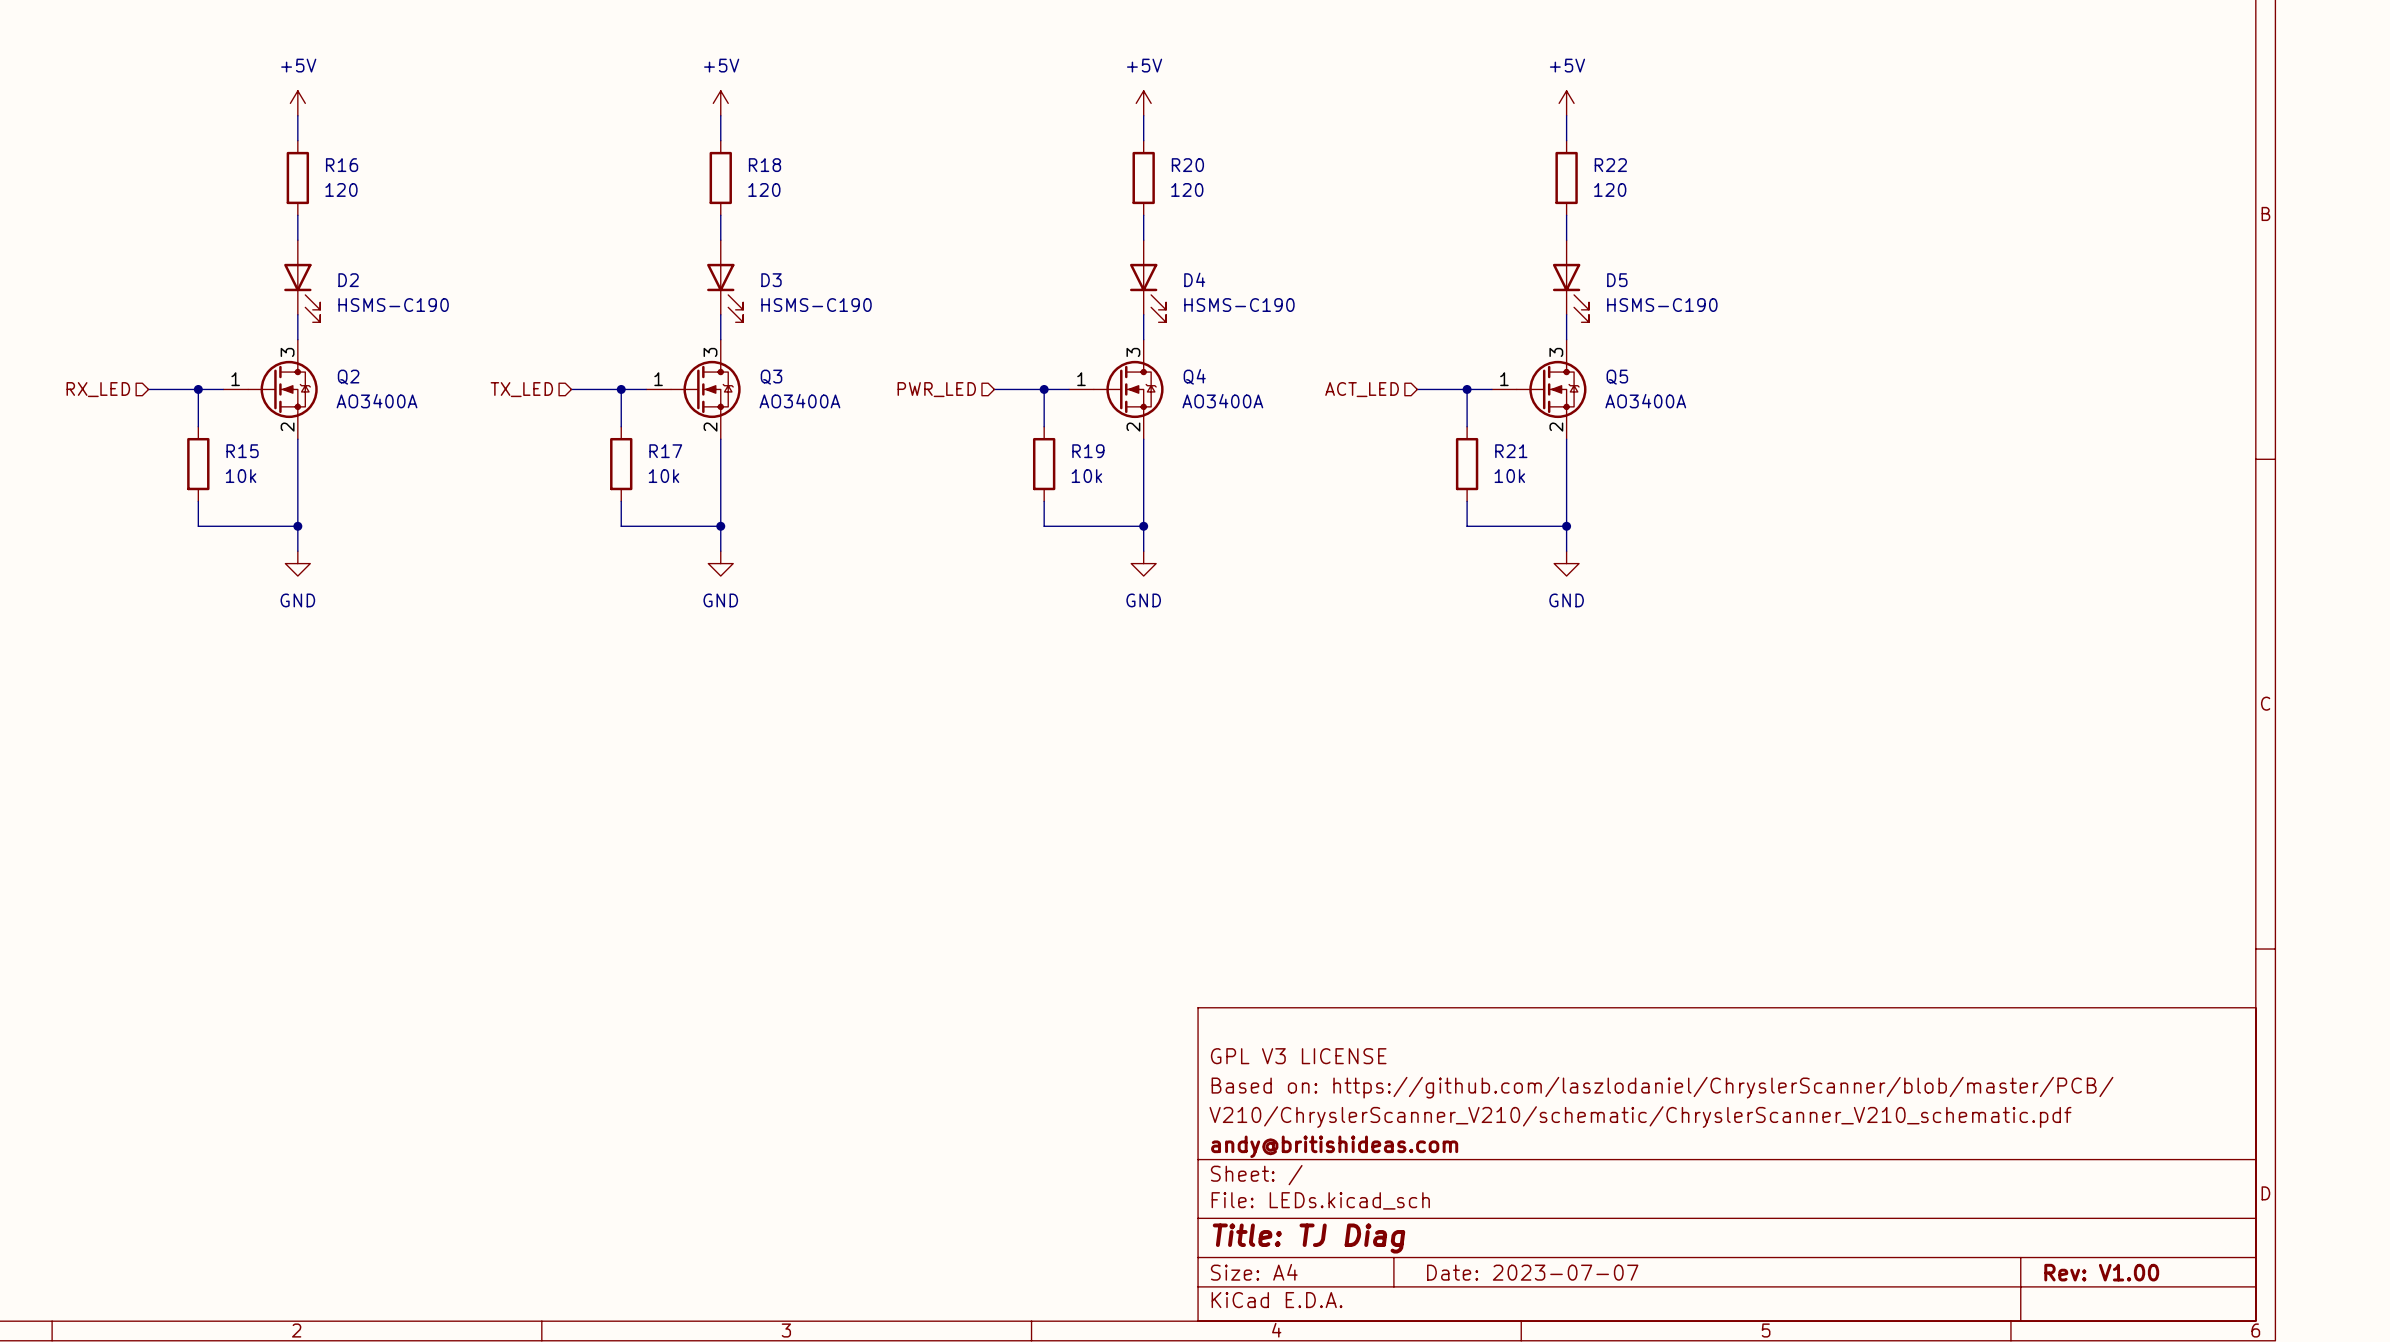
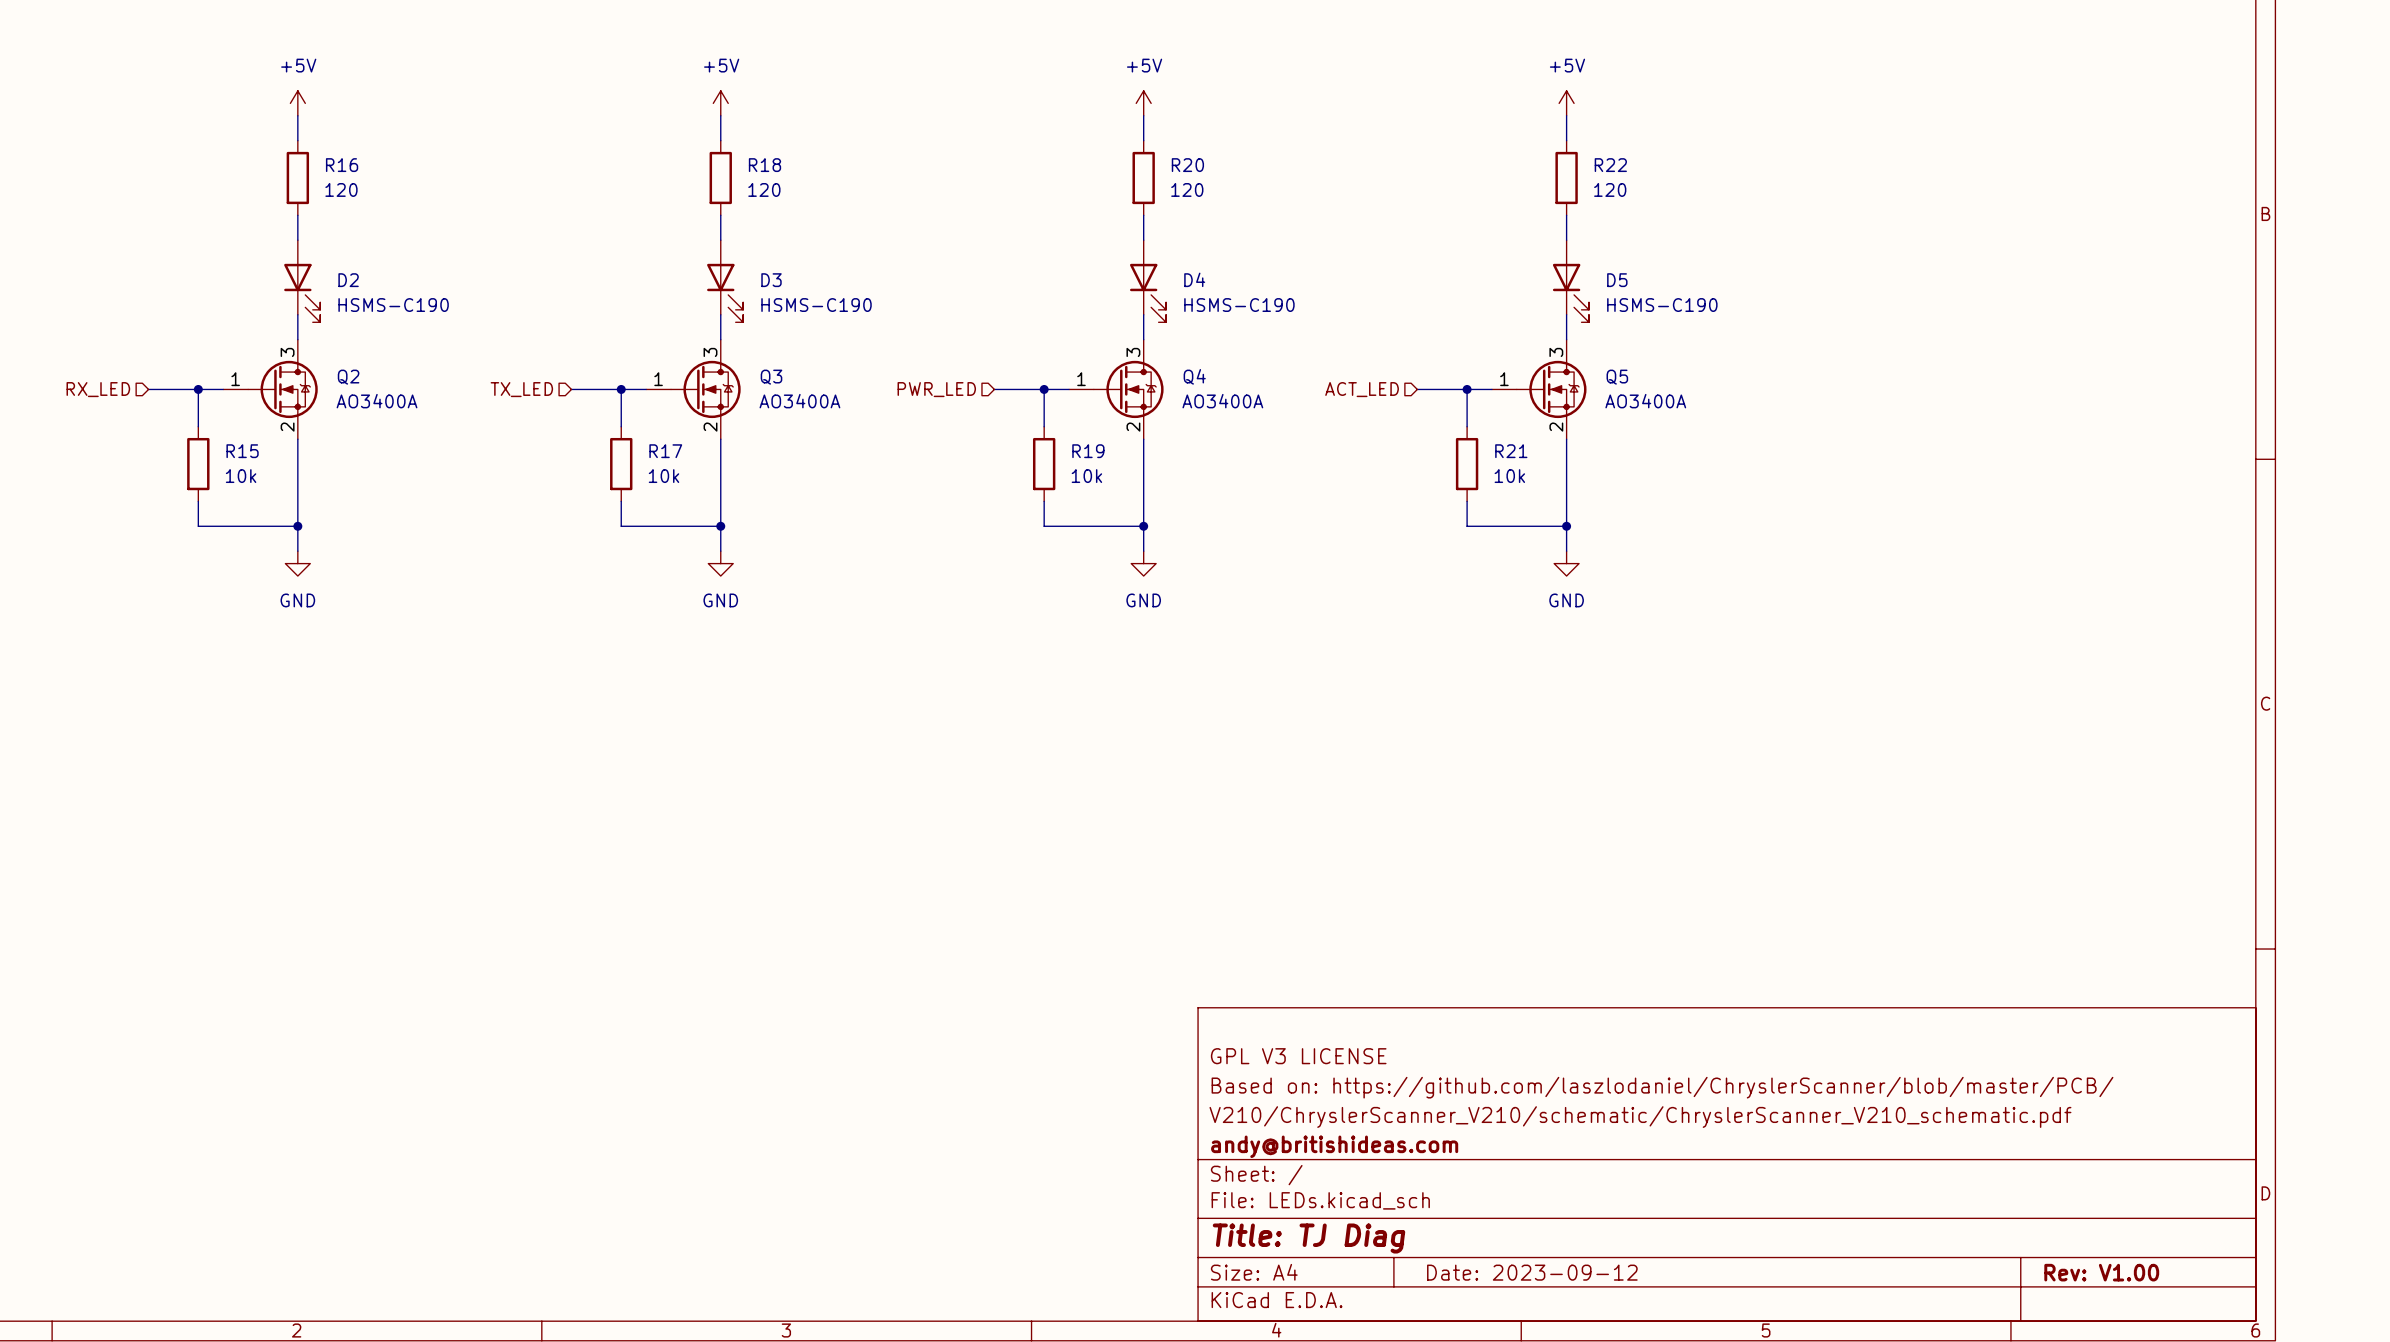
title block: Date: 2023-07-07 (1532, 1272) -> Date: 2023-09-12 (1532, 1272)

